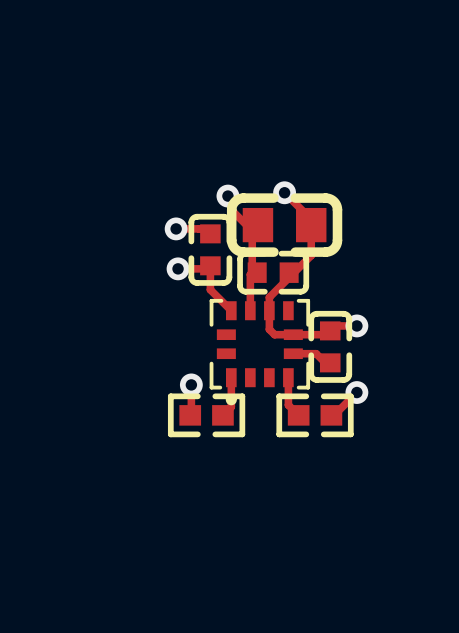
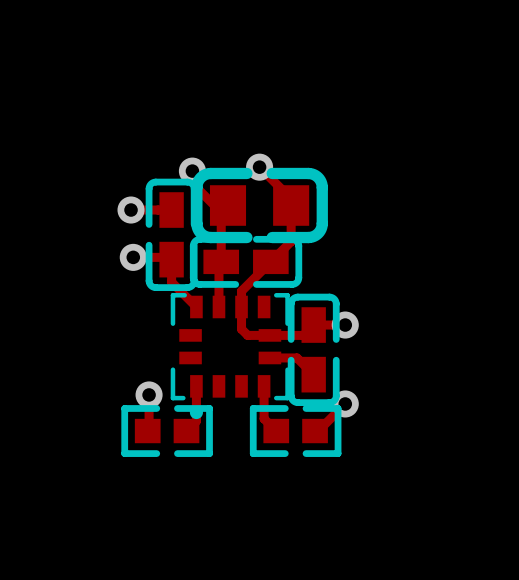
part footprint: [188, 213, 233, 286] -> [145, 178, 198, 291]
part footprint: [237, 250, 310, 295] -> [189, 235, 303, 288]
part footprint: [308, 310, 353, 383] -> [287, 293, 340, 407]

